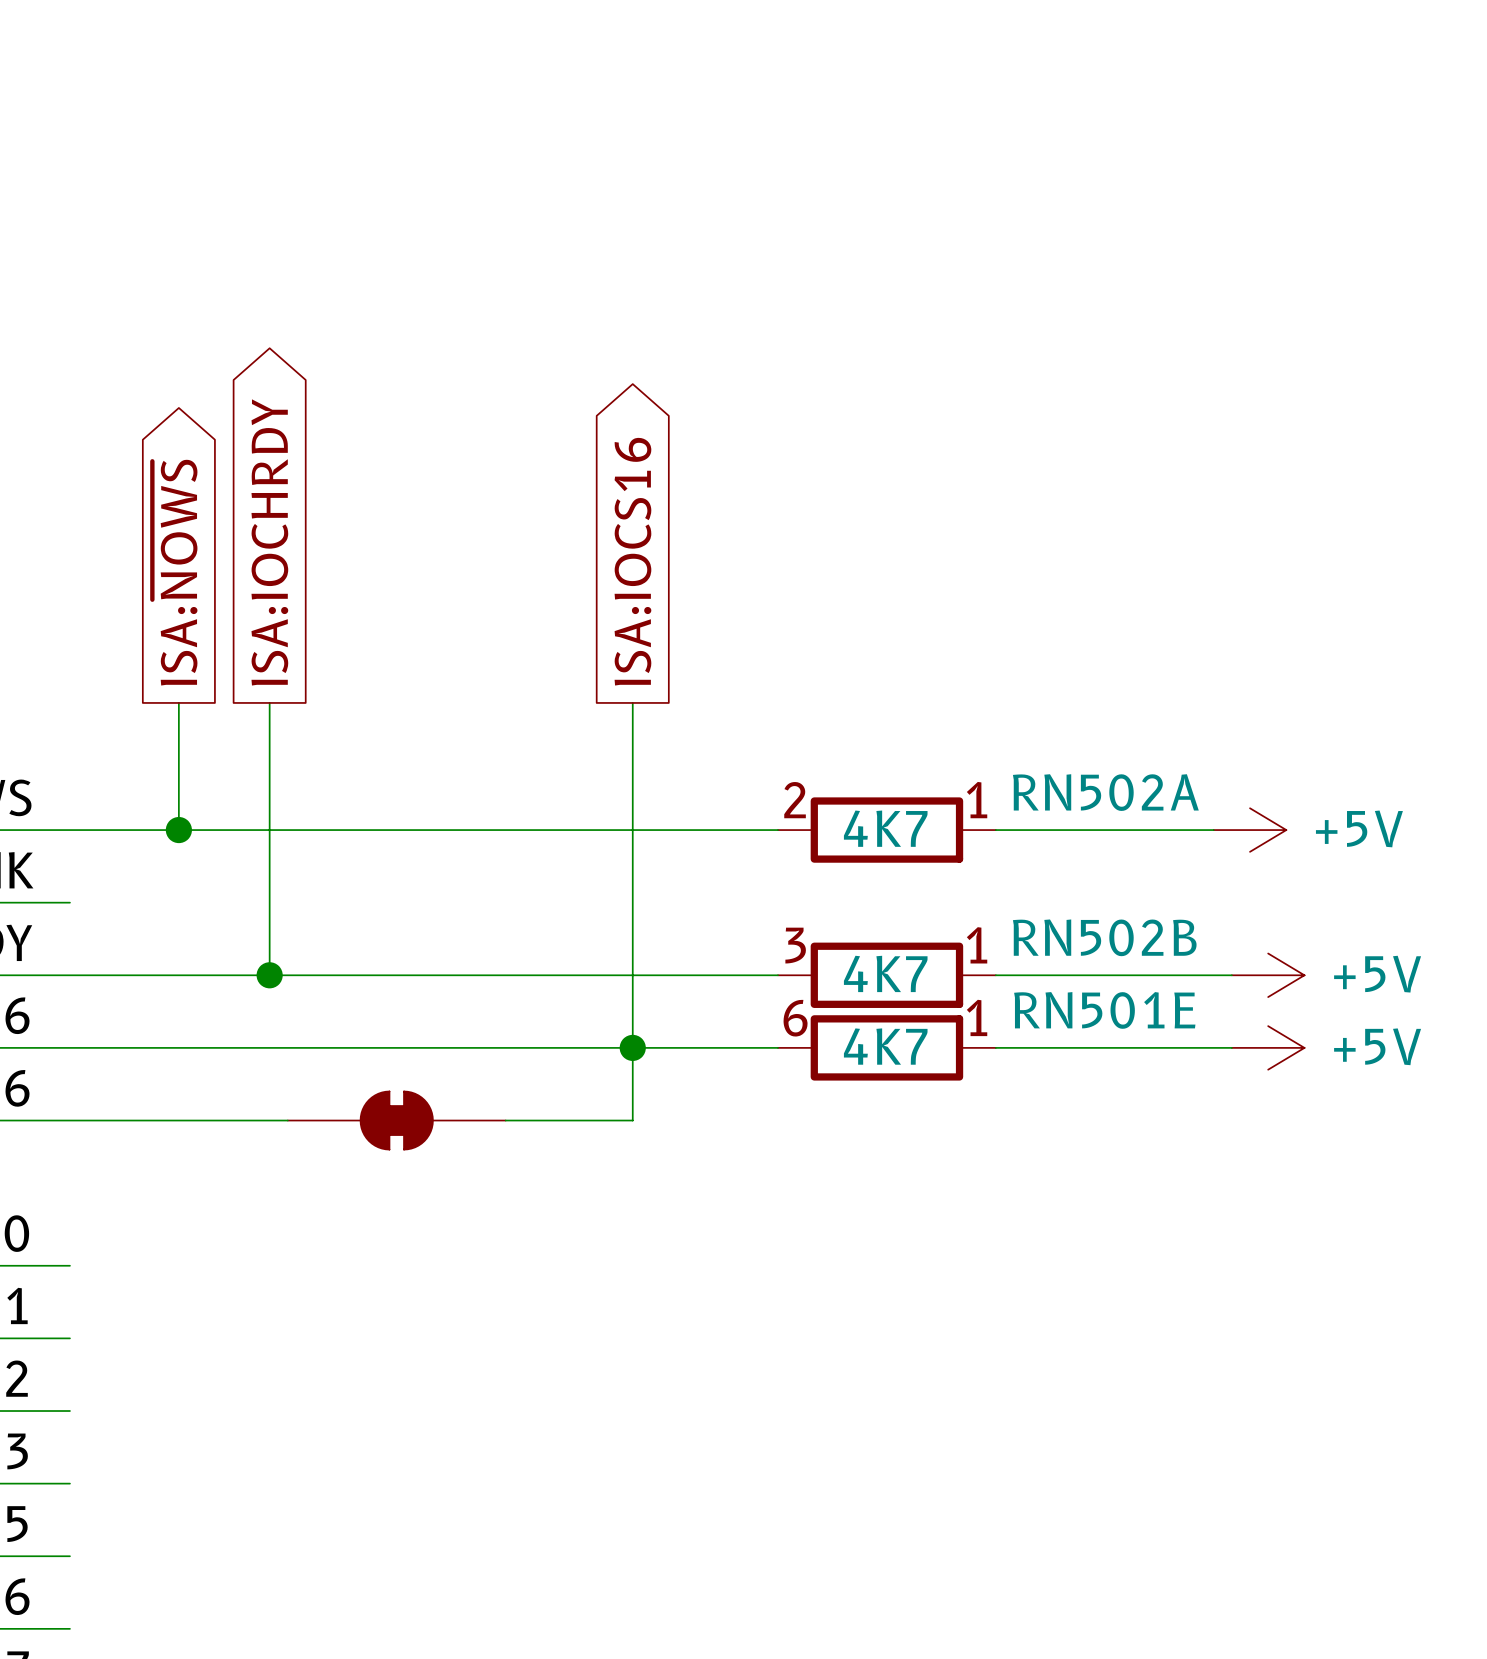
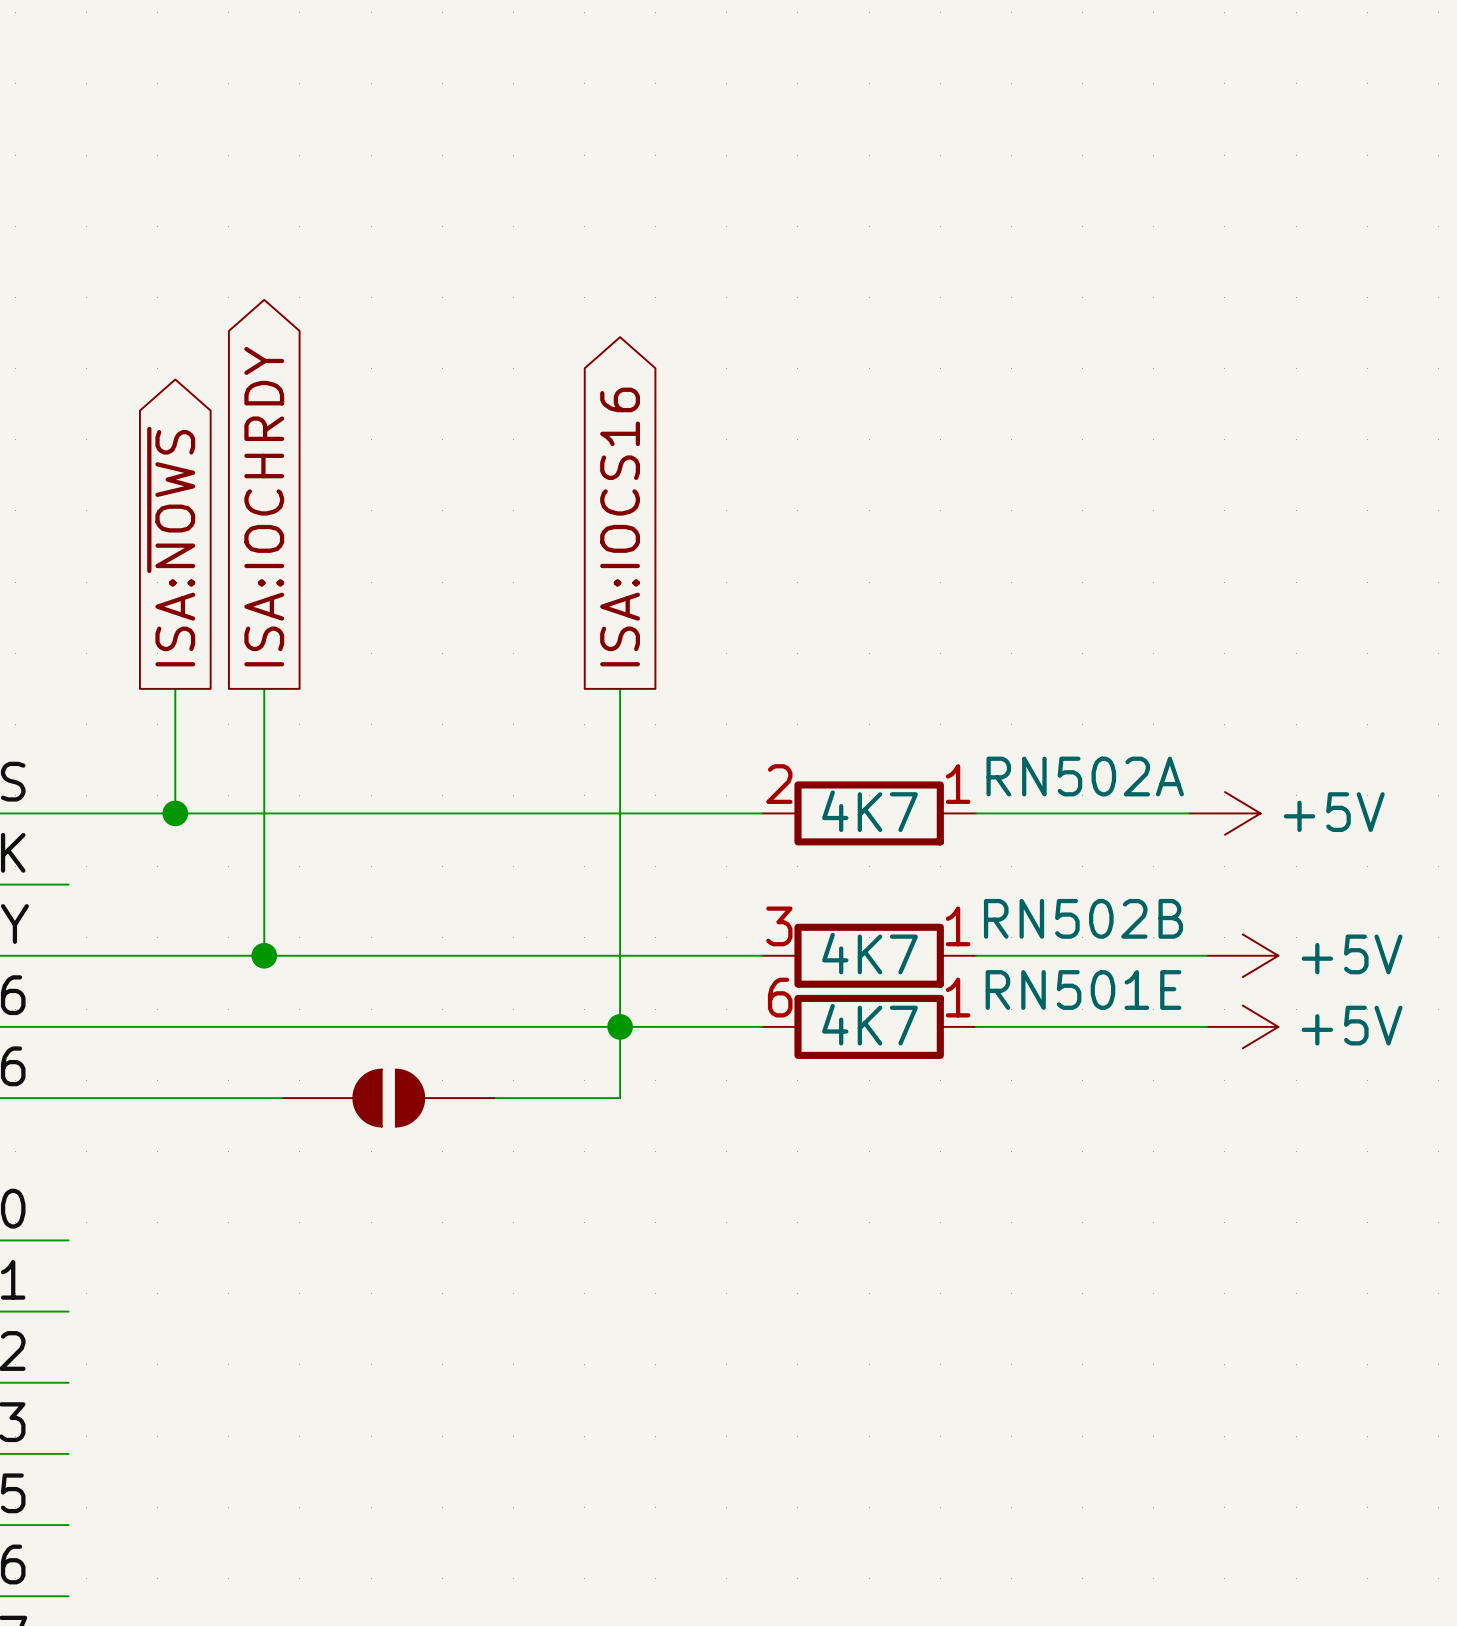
part symbol: [287, 1091, 506, 1150] -> [282, 1069, 496, 1127]

